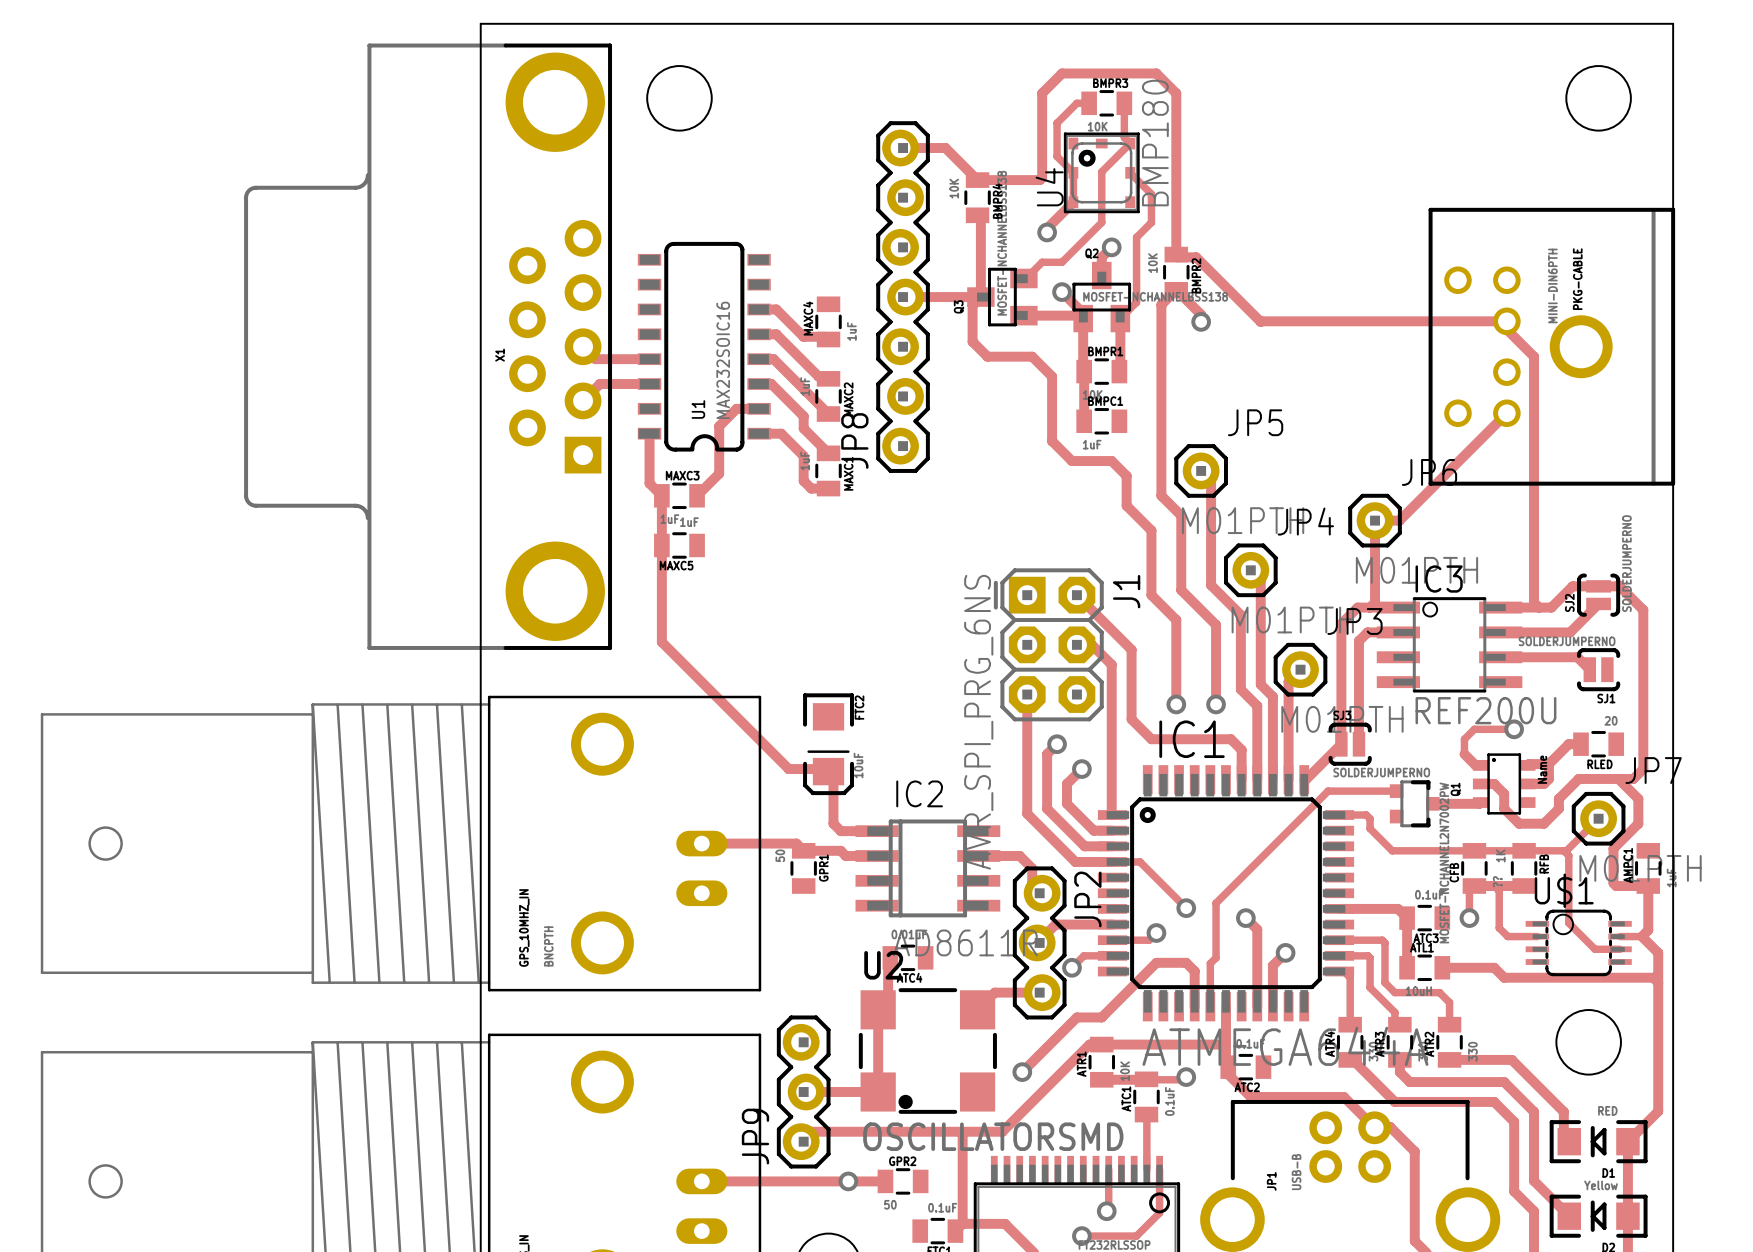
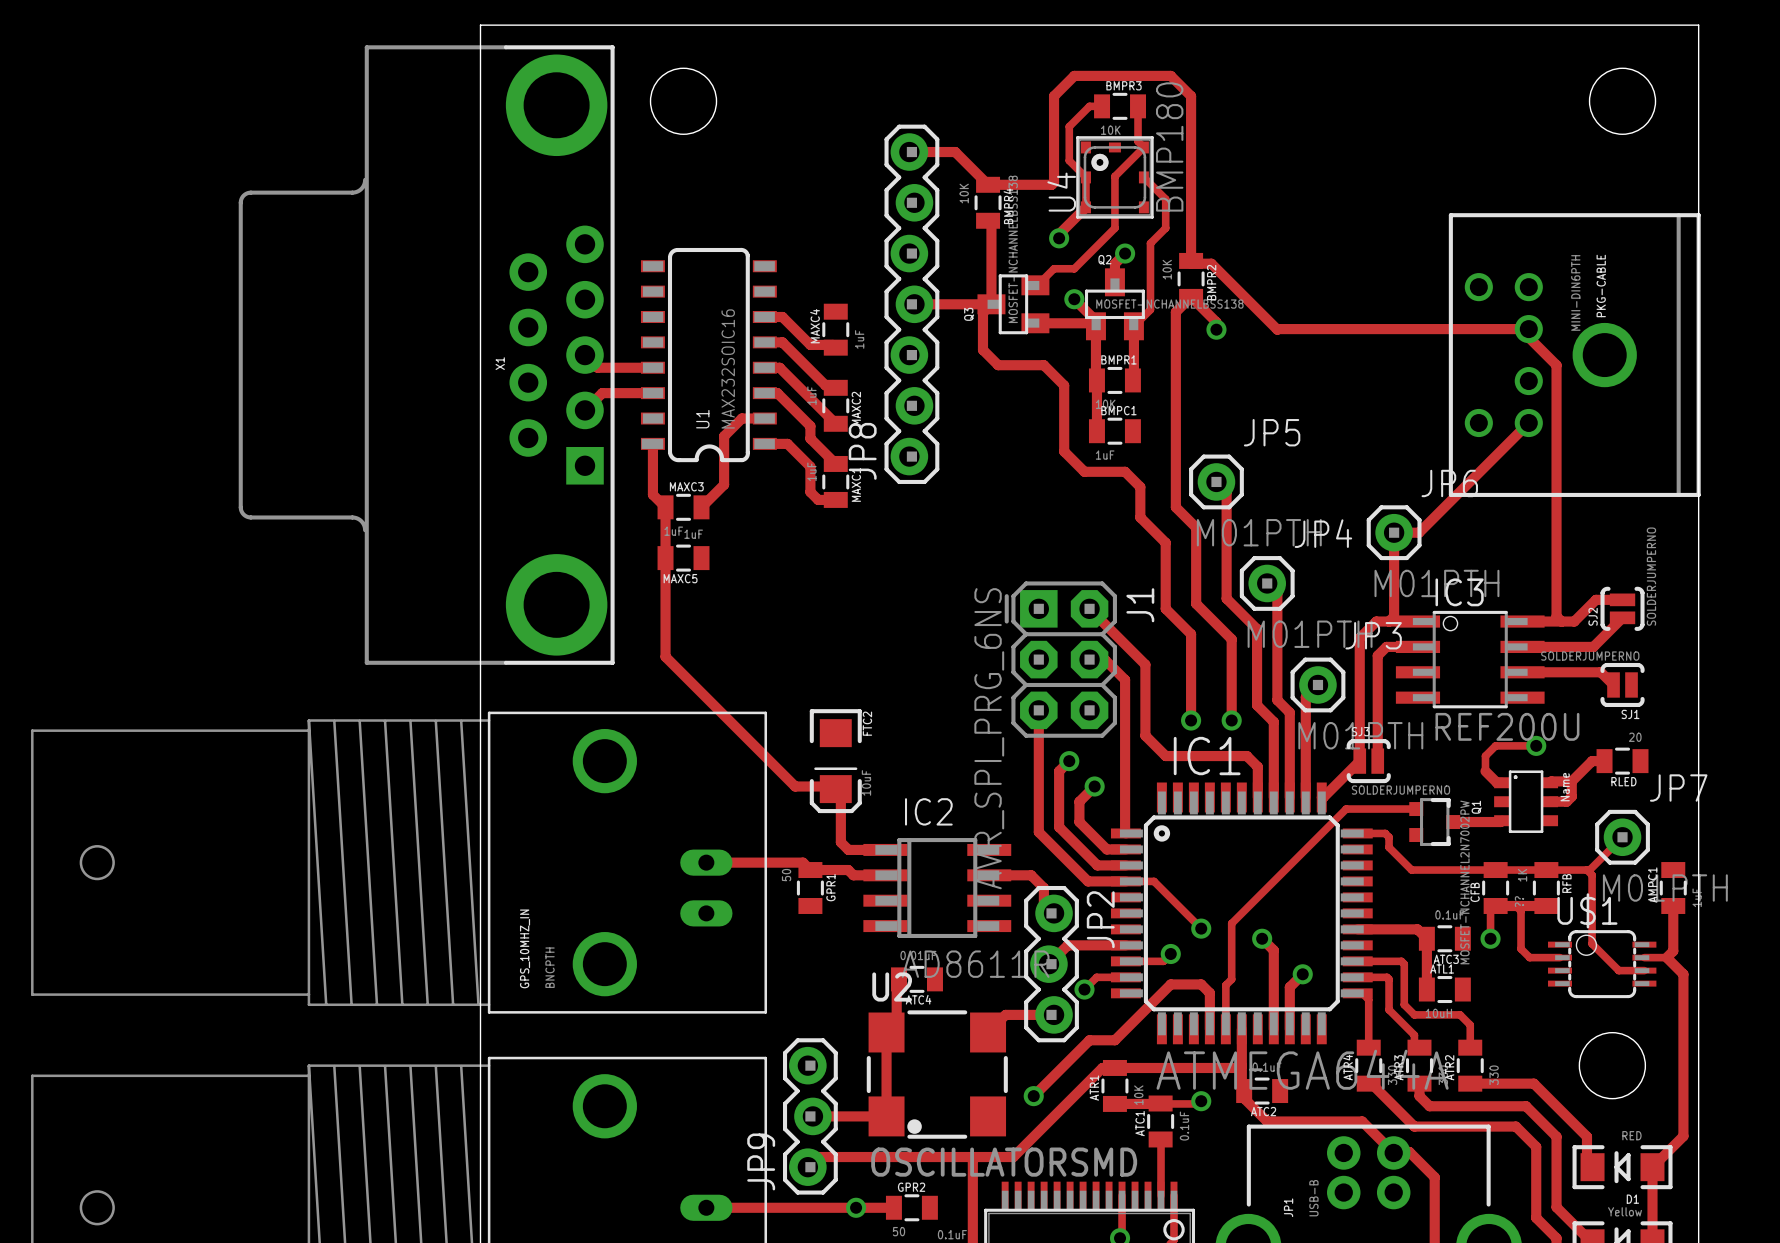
track: (1598, 586) (1618, 585) (1643, 610) (1643, 769) (1633, 778) (1578, 778) (1558, 798) (1558, 808) (1543, 823) (1519, 823) (1504, 808) (1504, 793) (1494, 783) (1480, 783) -> none
track: (1618, 778) (1638, 798) (1638, 823) (1613, 848) (1613, 883) (1616, 886) (1648, 886) -> none
track: (1442, 967) (1494, 967) (1504, 977) (1653, 977) (1658, 982) -> none

